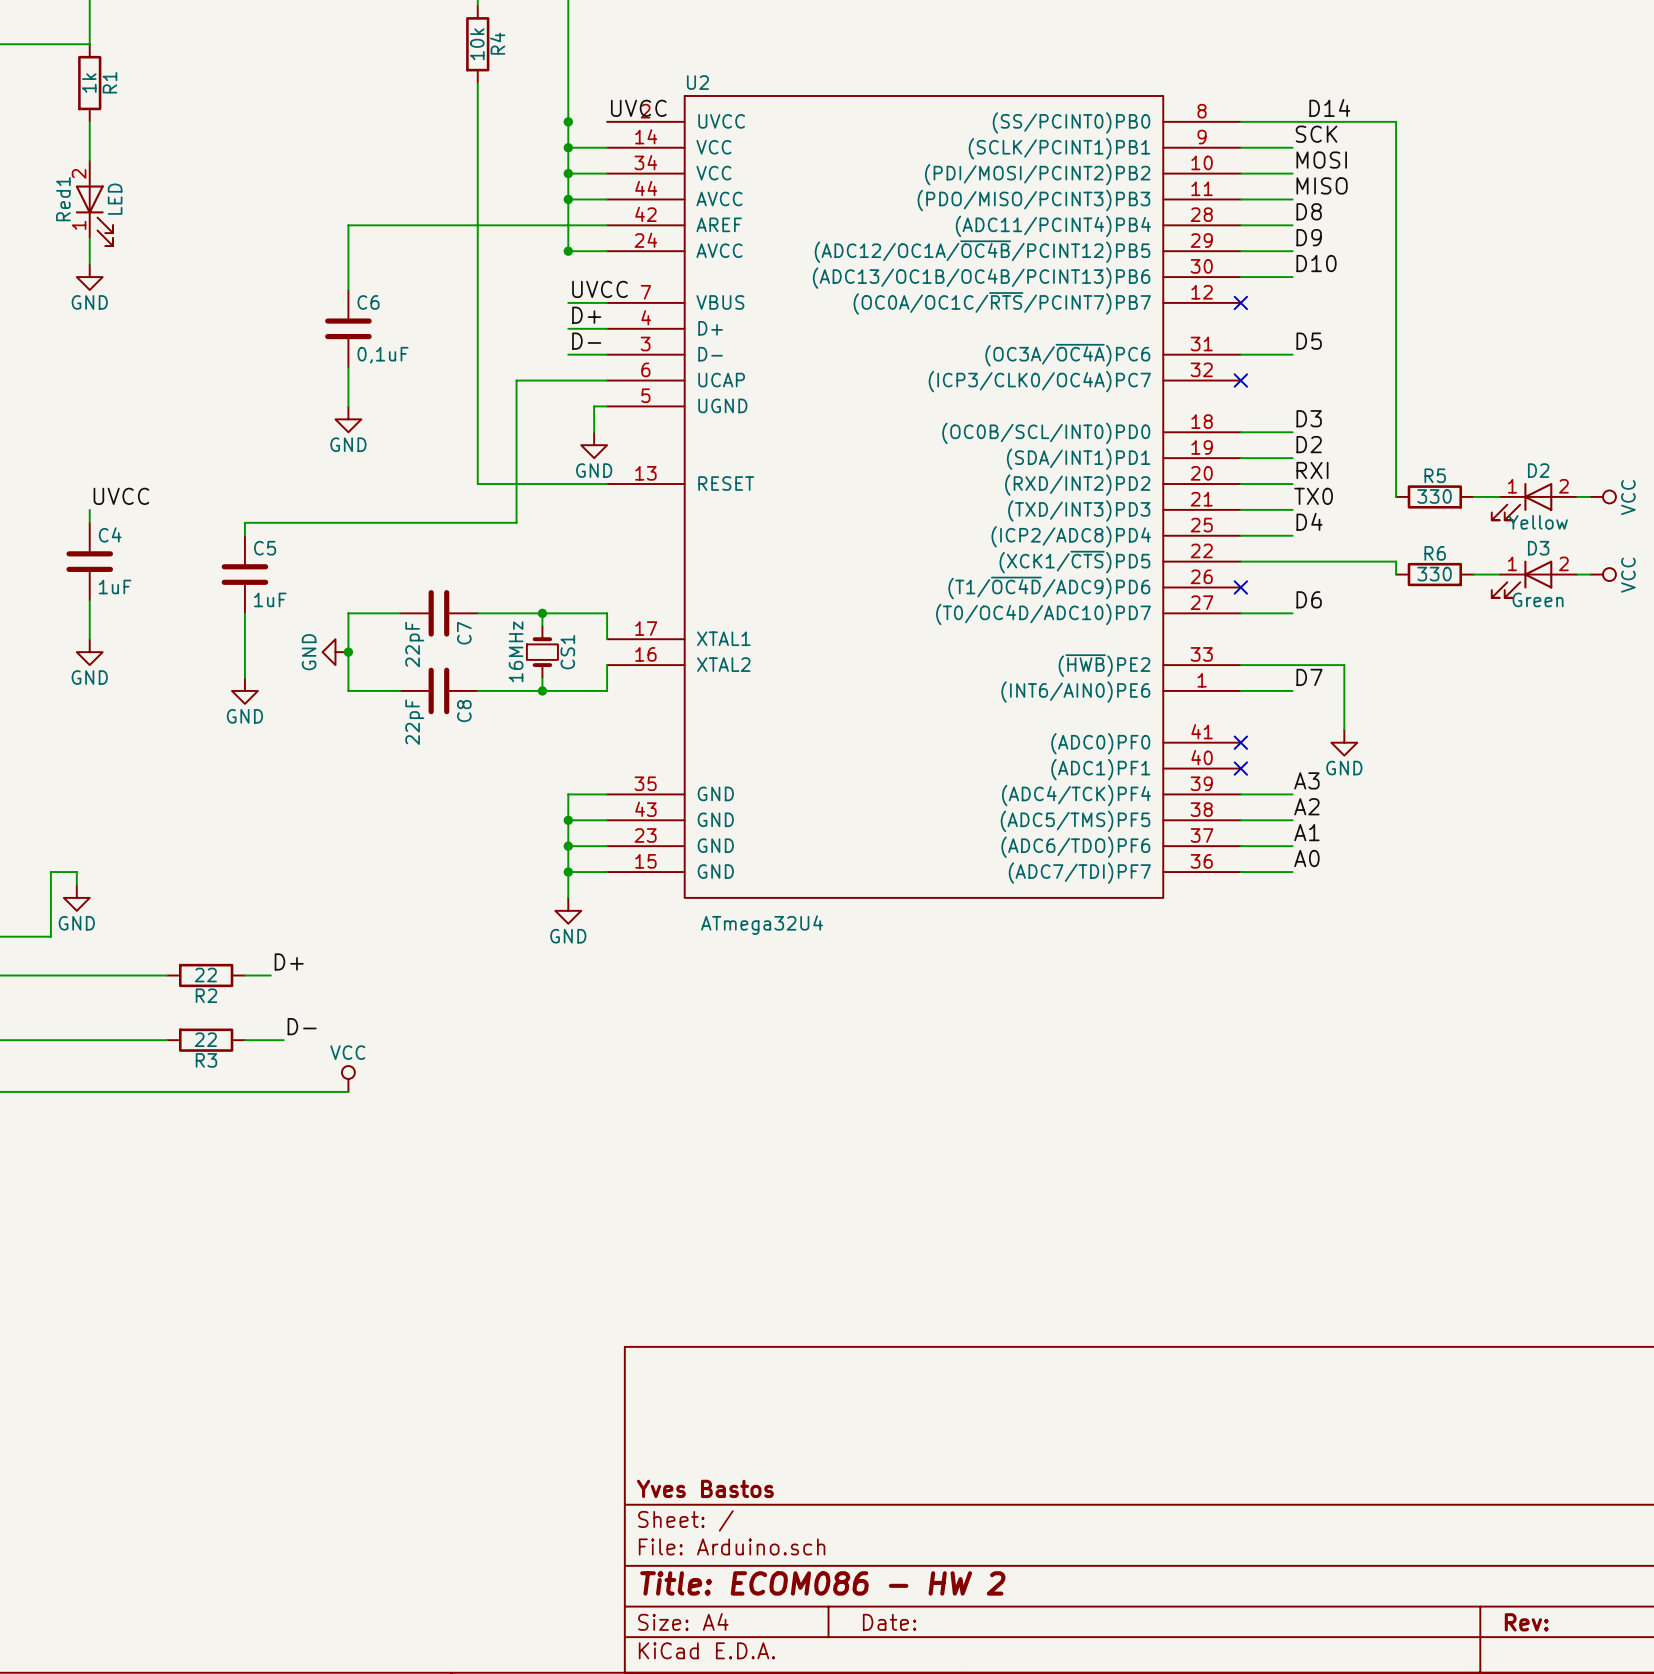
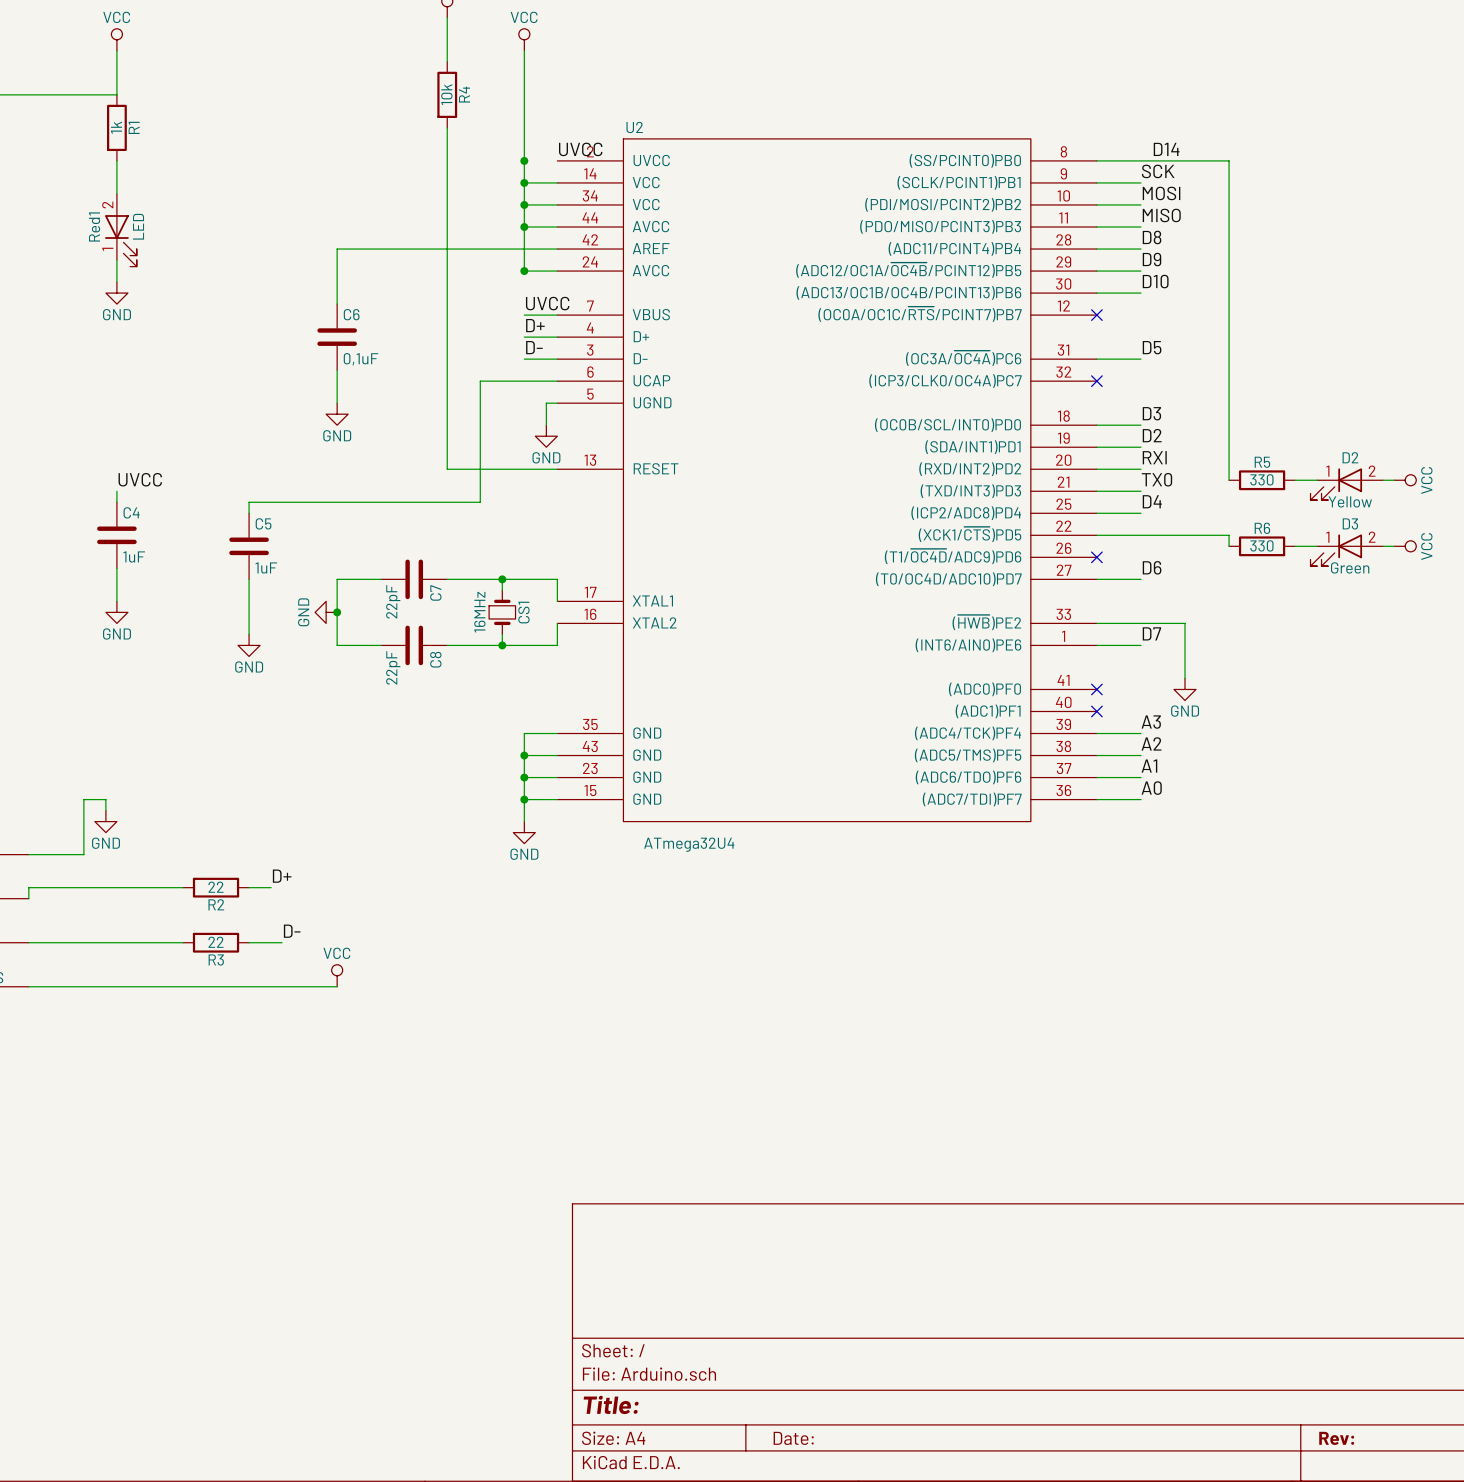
title block: Yves Bastos (705, 1488) -> none
title block: Title: ECOM086 - HW 2 (822, 1583) -> Title: (611, 1404)

